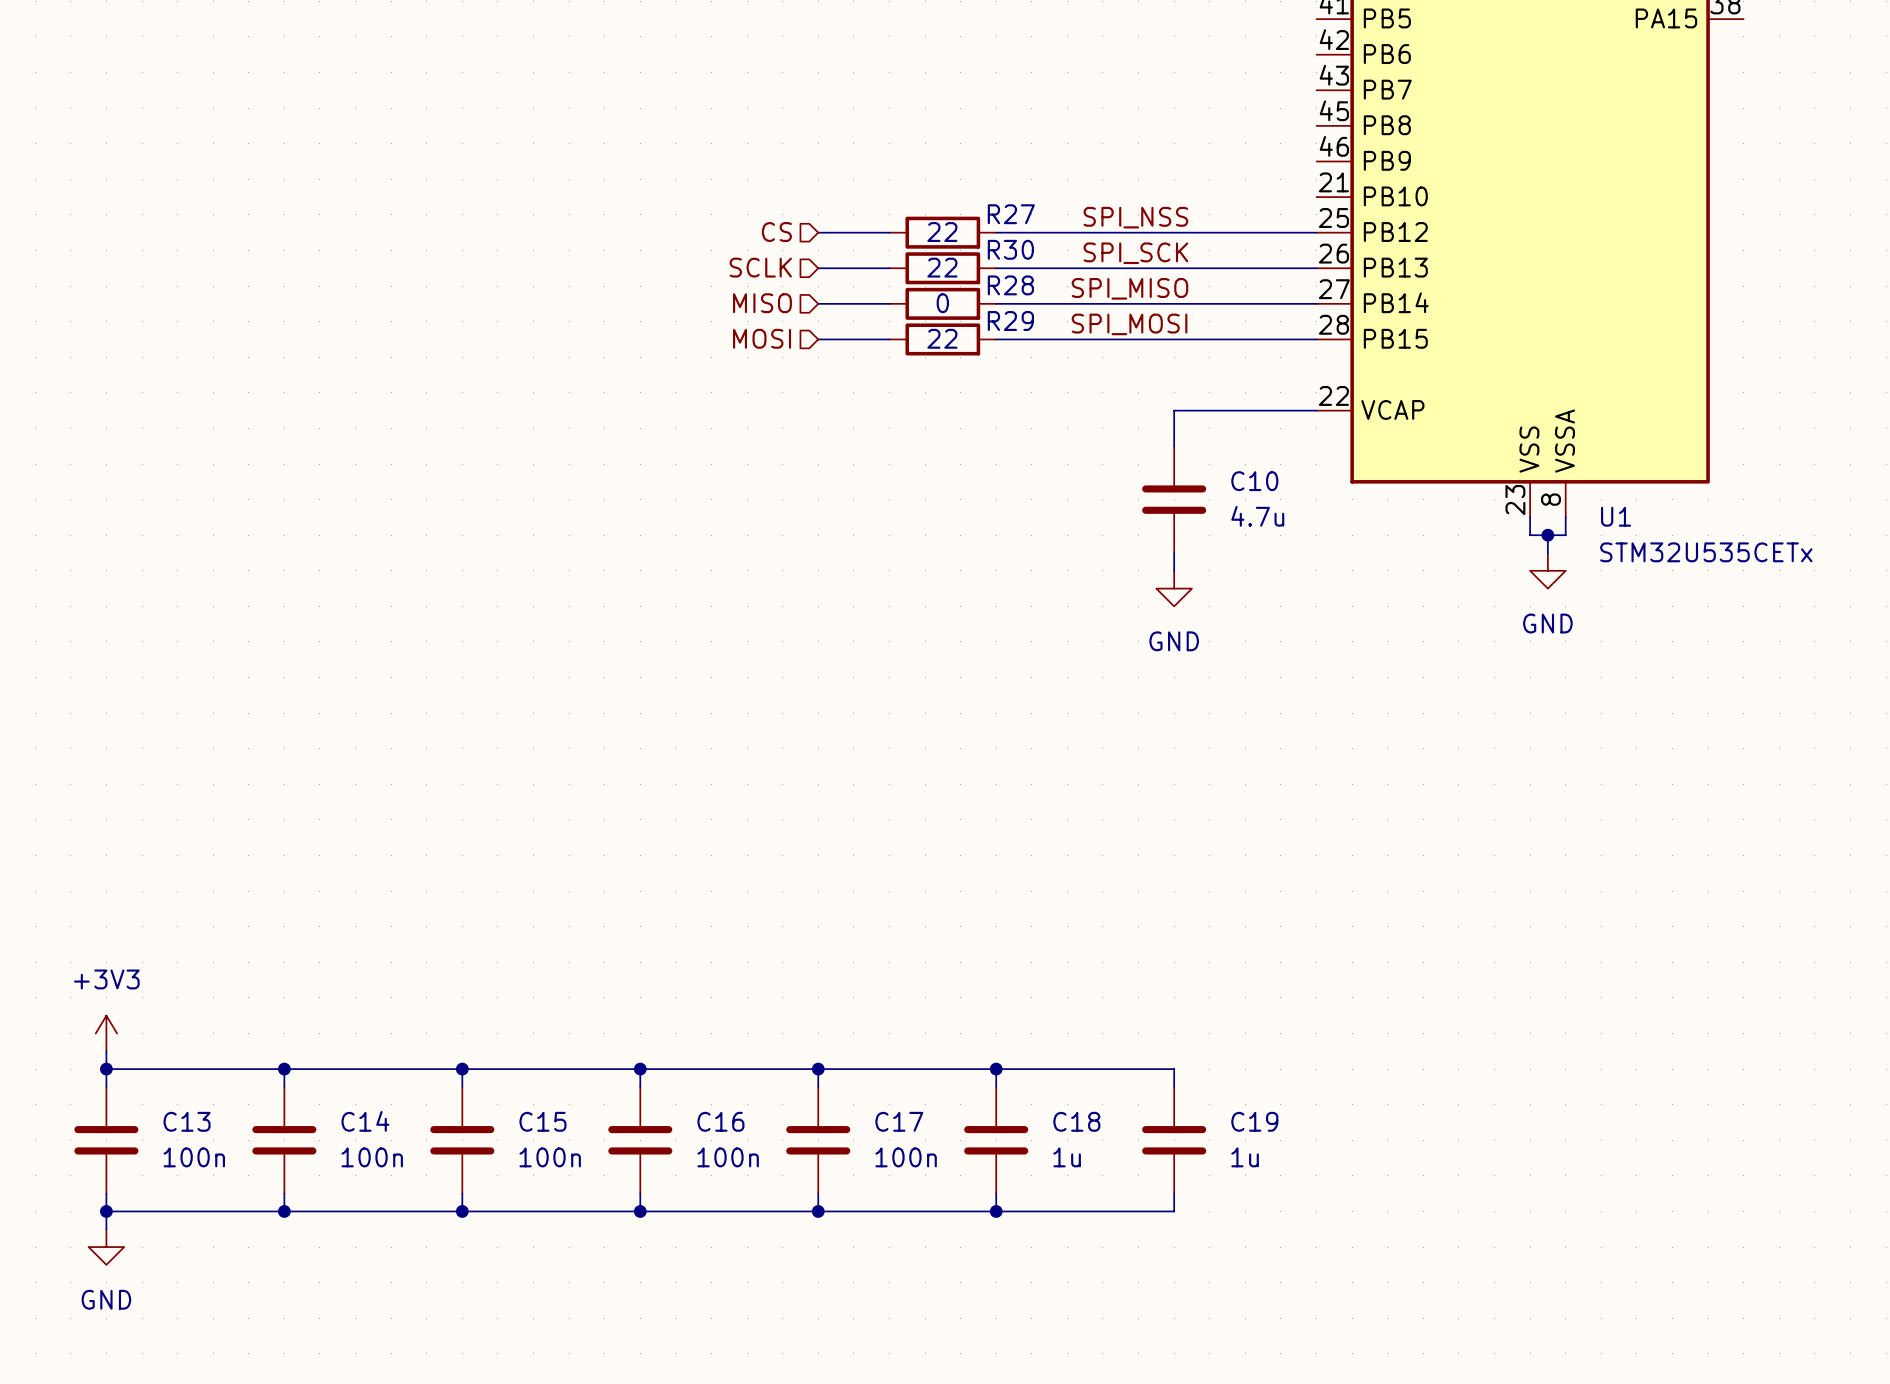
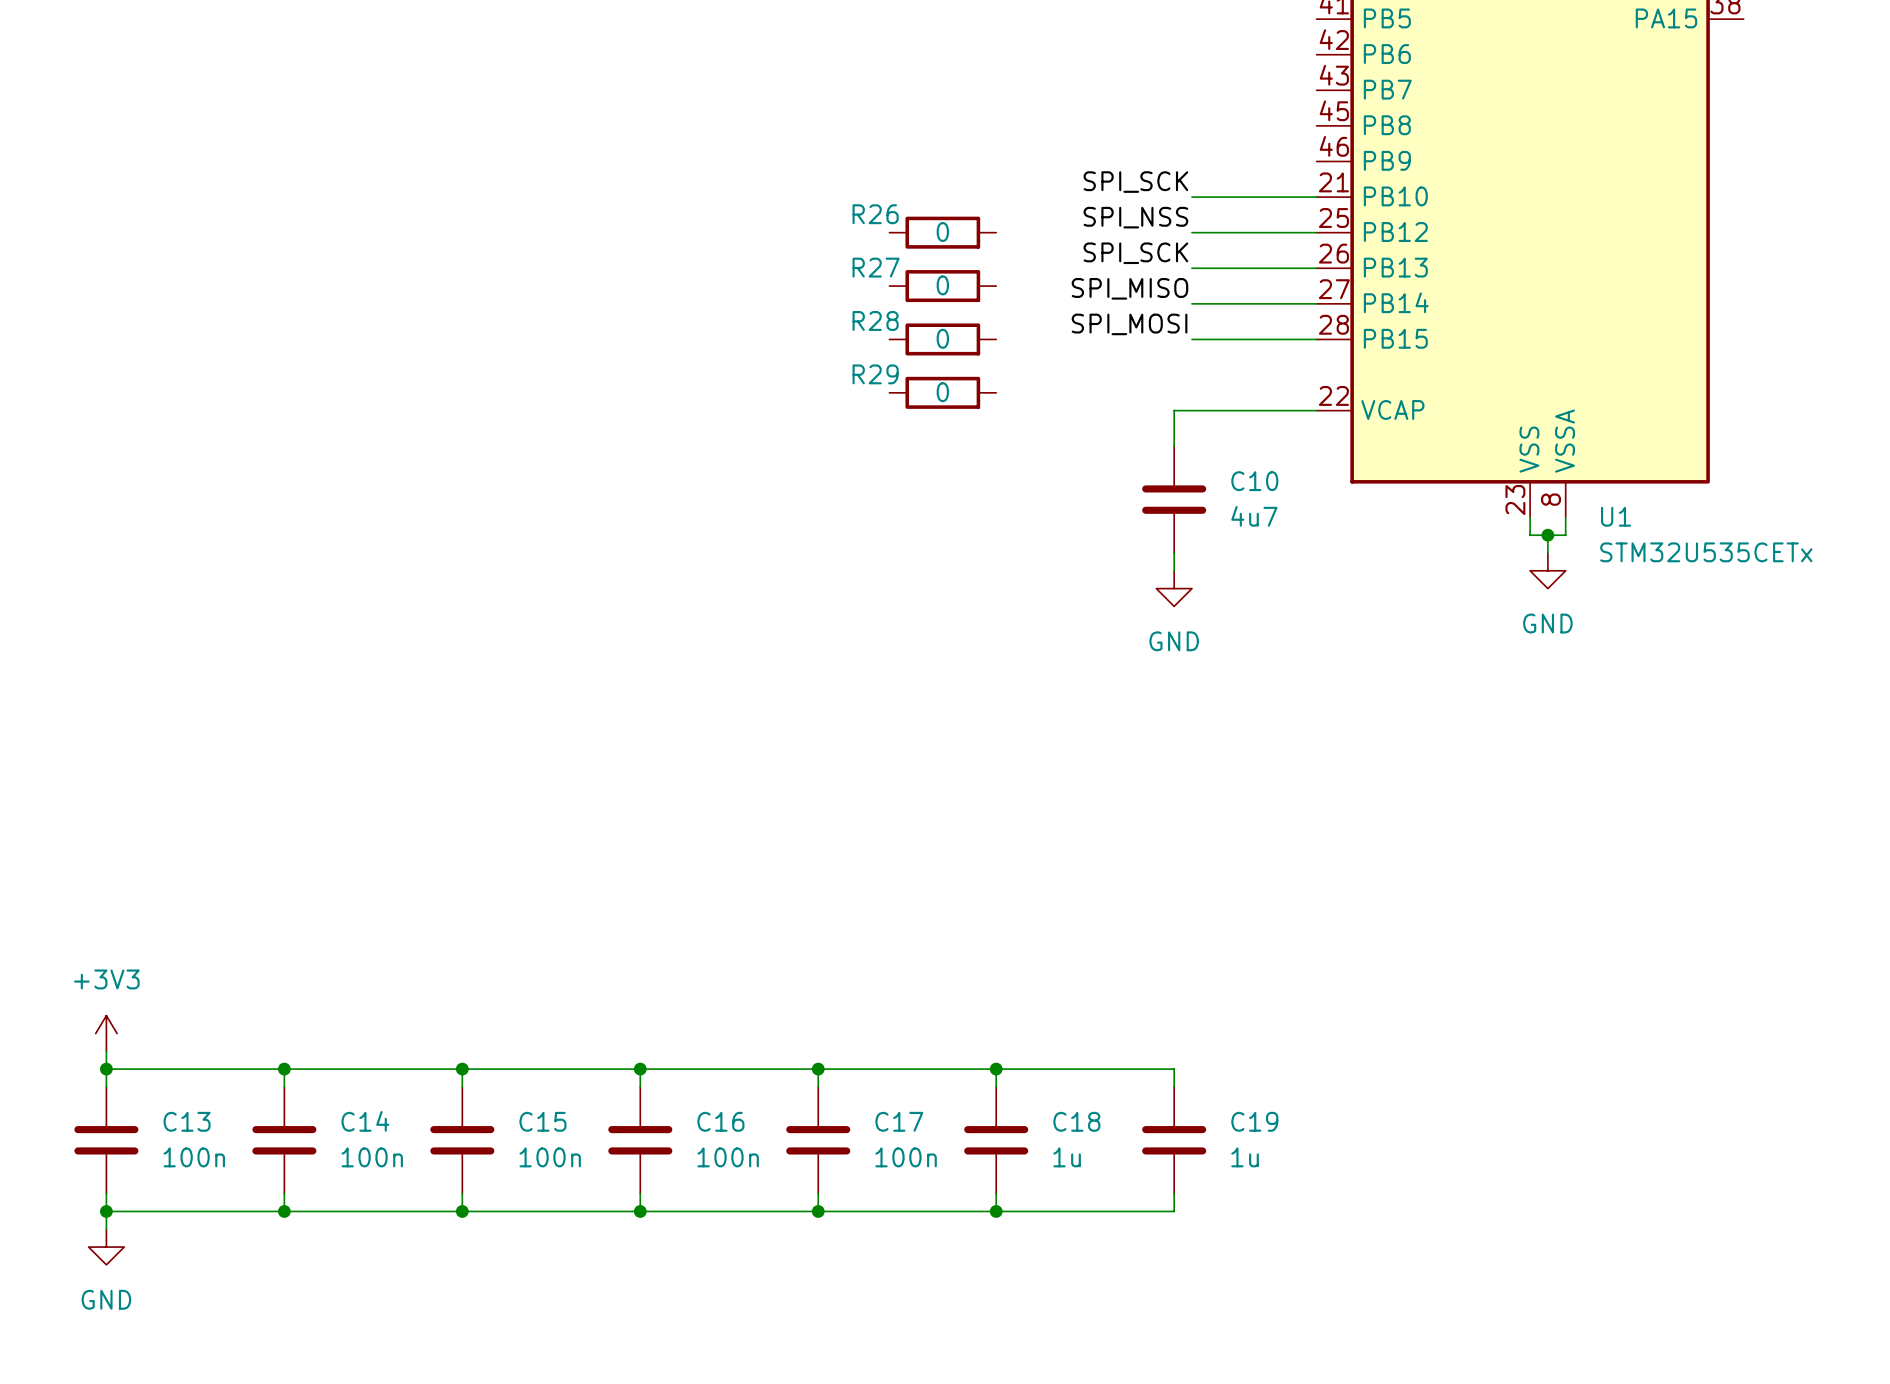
label: none -> SPI_SCK (1135, 182)
wire: none -> (1191, 197) (1316, 197)
R27 name: R27 (1011, 214) -> R26 (875, 214)
hierarchical label: CS (776, 232) -> none
wire: (818, 232) (889, 232) -> none
R27 value: 22 (942, 232) -> 0 (942, 232)
wire: (996, 232) (1191, 232) -> none
hierarchical label: SCLK (760, 267) -> none
wire: (818, 268) (889, 268) -> none
R30: 22 (942, 268) -> none
wire: (996, 268) (1191, 268) -> none
R27: none -> 0 (942, 286)
hierarchical label: MISO (762, 303) -> none
wire: (818, 303) (889, 303) -> none
R28: 0 (942, 303) -> none
wire: (996, 303) (1191, 303) -> none
R29 name: R29 (1010, 320) -> R28 (875, 320)
hierarchical label: MOSI (762, 338) -> none
R29 value: 22 (942, 338) -> 0 (942, 338)
wire: (818, 339) (889, 339) -> none
wire: (996, 339) (1191, 339) -> none
R29: none -> 0 (942, 392)
C10 value: 4.7u (1257, 516) -> 4u7 (1254, 516)

